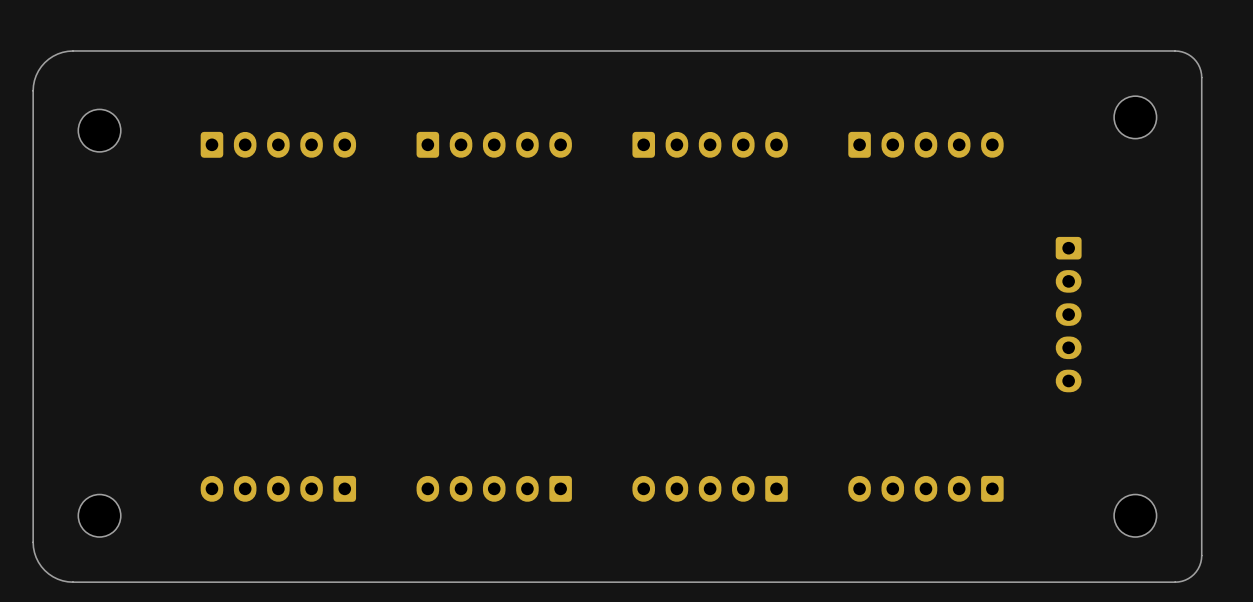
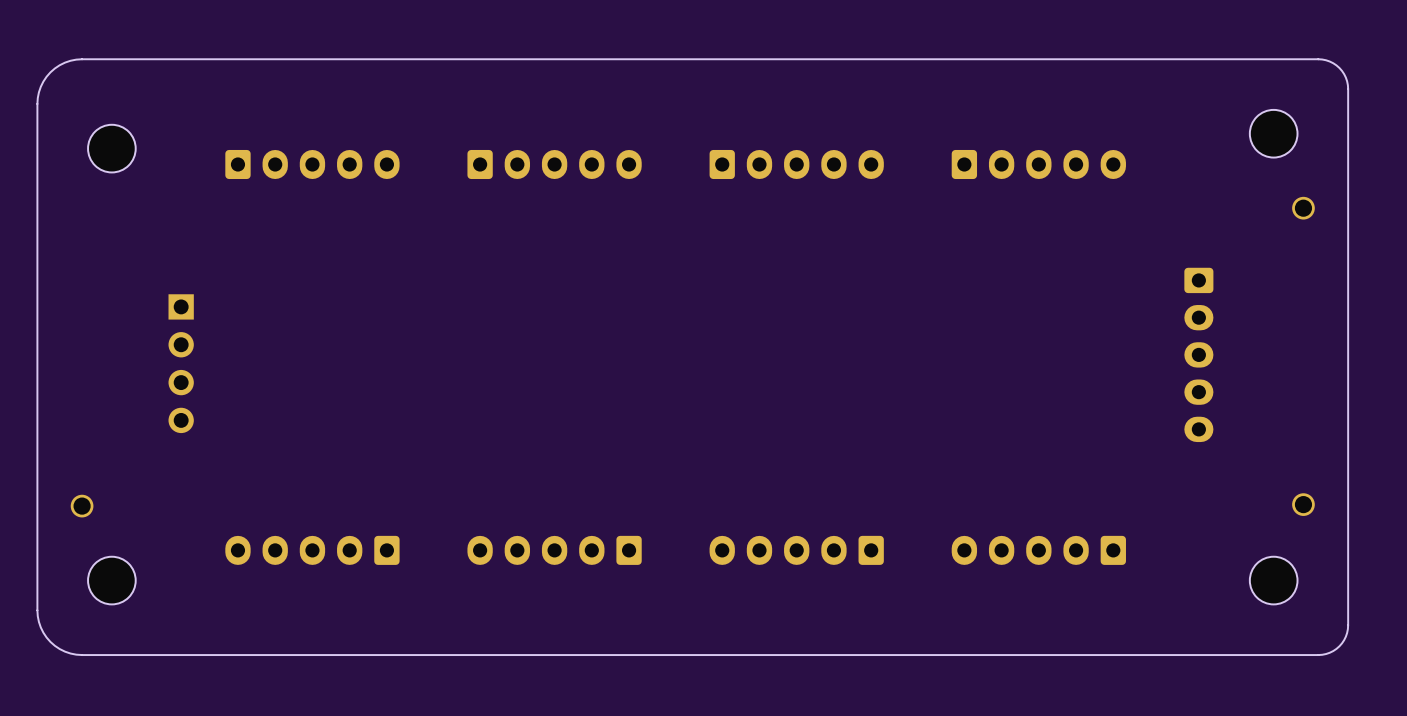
part: none -> (1303, 208)
part: none -> (181, 363)
part: none -> (1303, 504)
part: none -> (82, 506)

